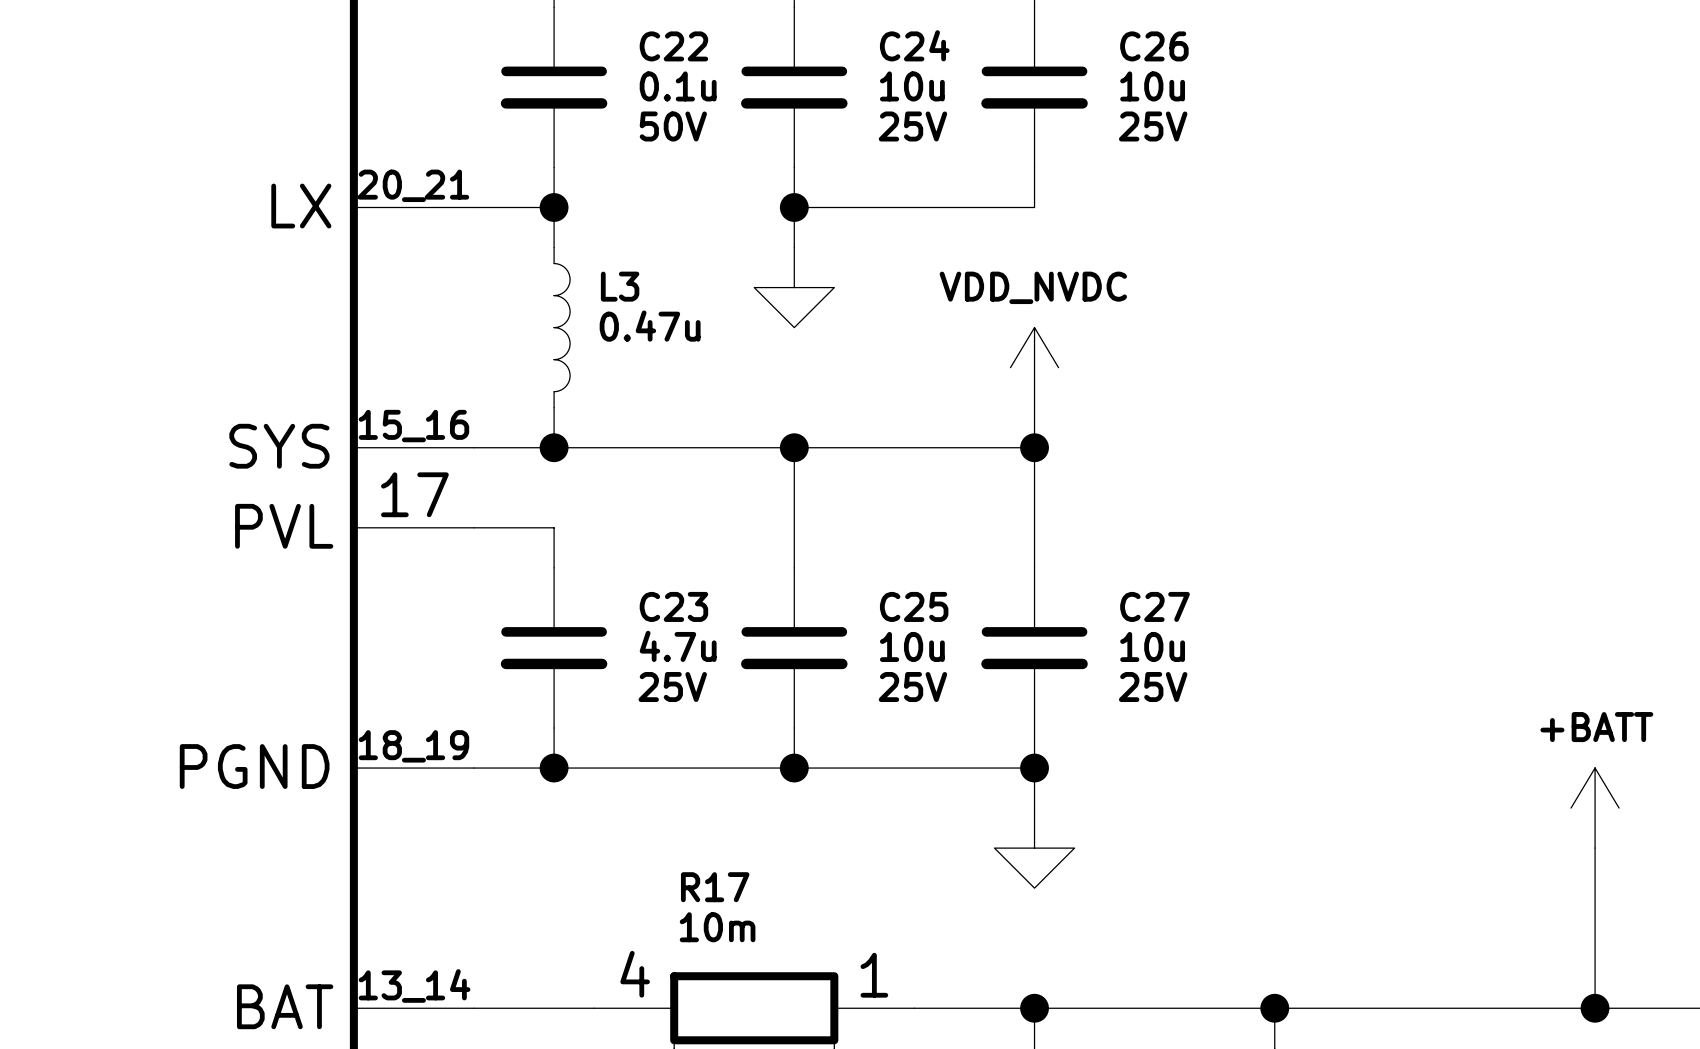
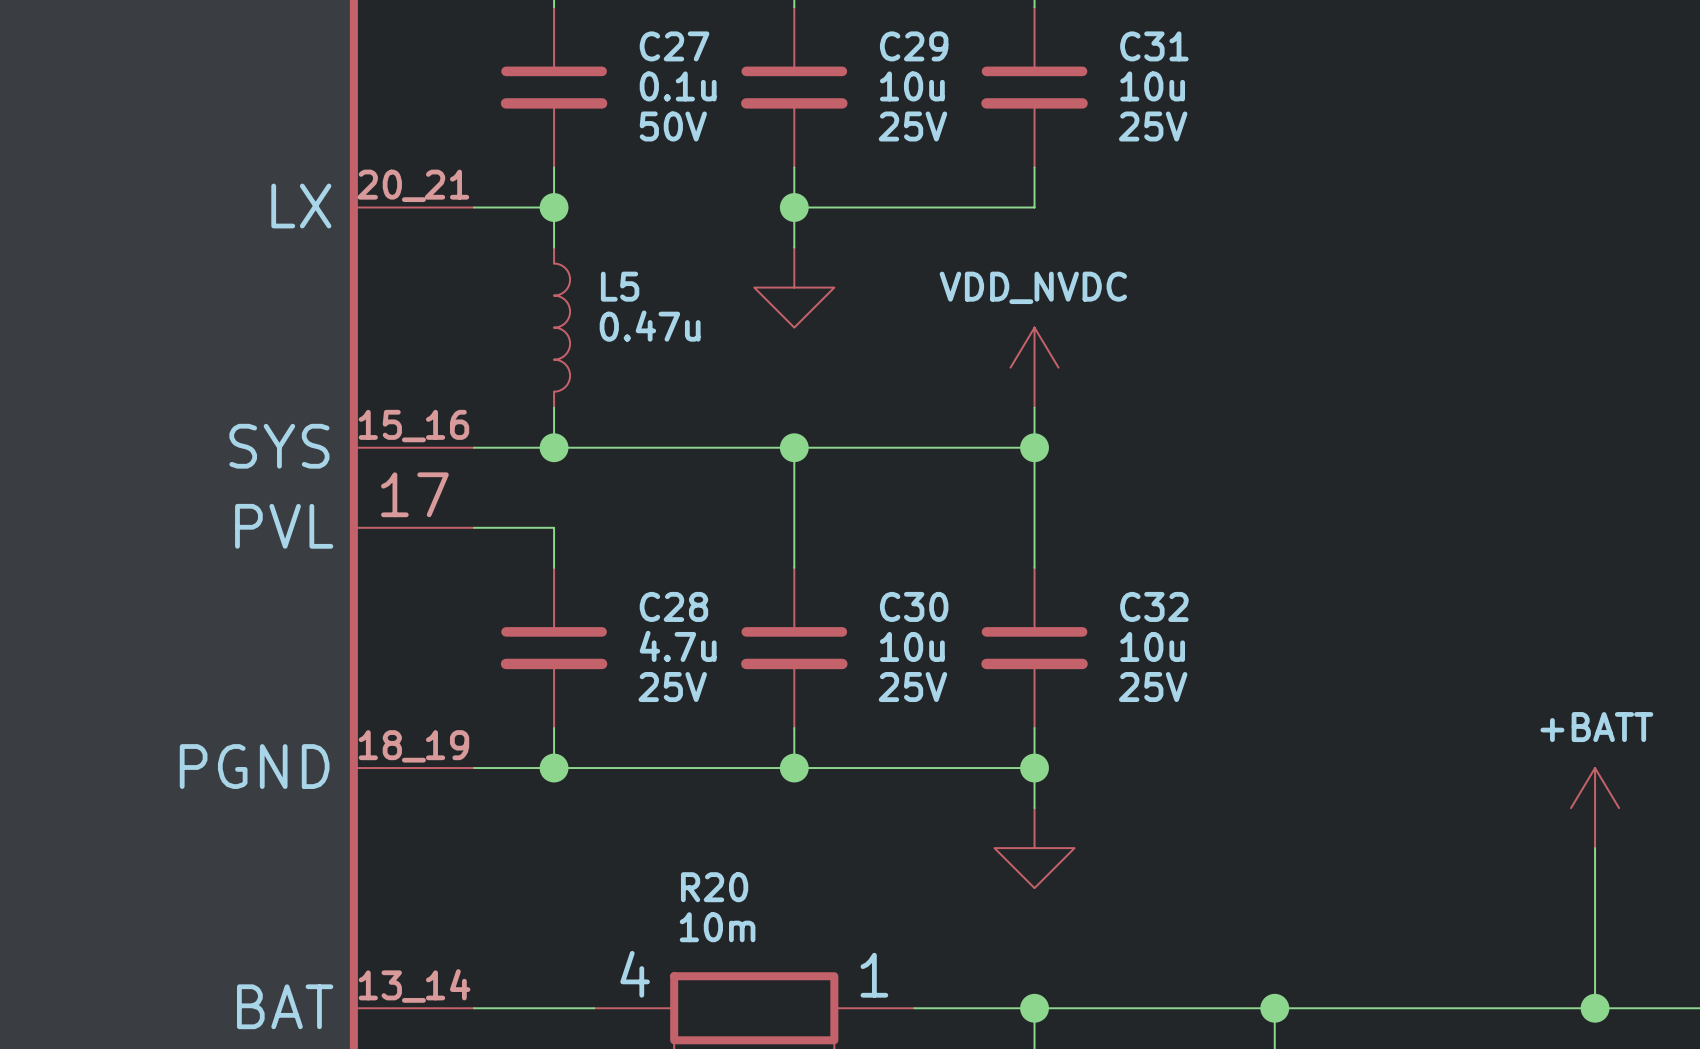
C24 name: C24 (914, 45) -> C29 (914, 46)
C22 name: C22 (673, 46) -> C27 (674, 46)
C26 name: C26 (1154, 46) -> C31 (1154, 46)
L3 name: L3 (620, 286) -> L5 (620, 286)
C23 name: C23 (673, 606) -> C28 (673, 606)
C25 name: C25 (914, 606) -> C30 (914, 606)
C27 name: C27 (1155, 606) -> C32 (1154, 606)
R17 name: R17 (715, 887) -> R20 (714, 887)

